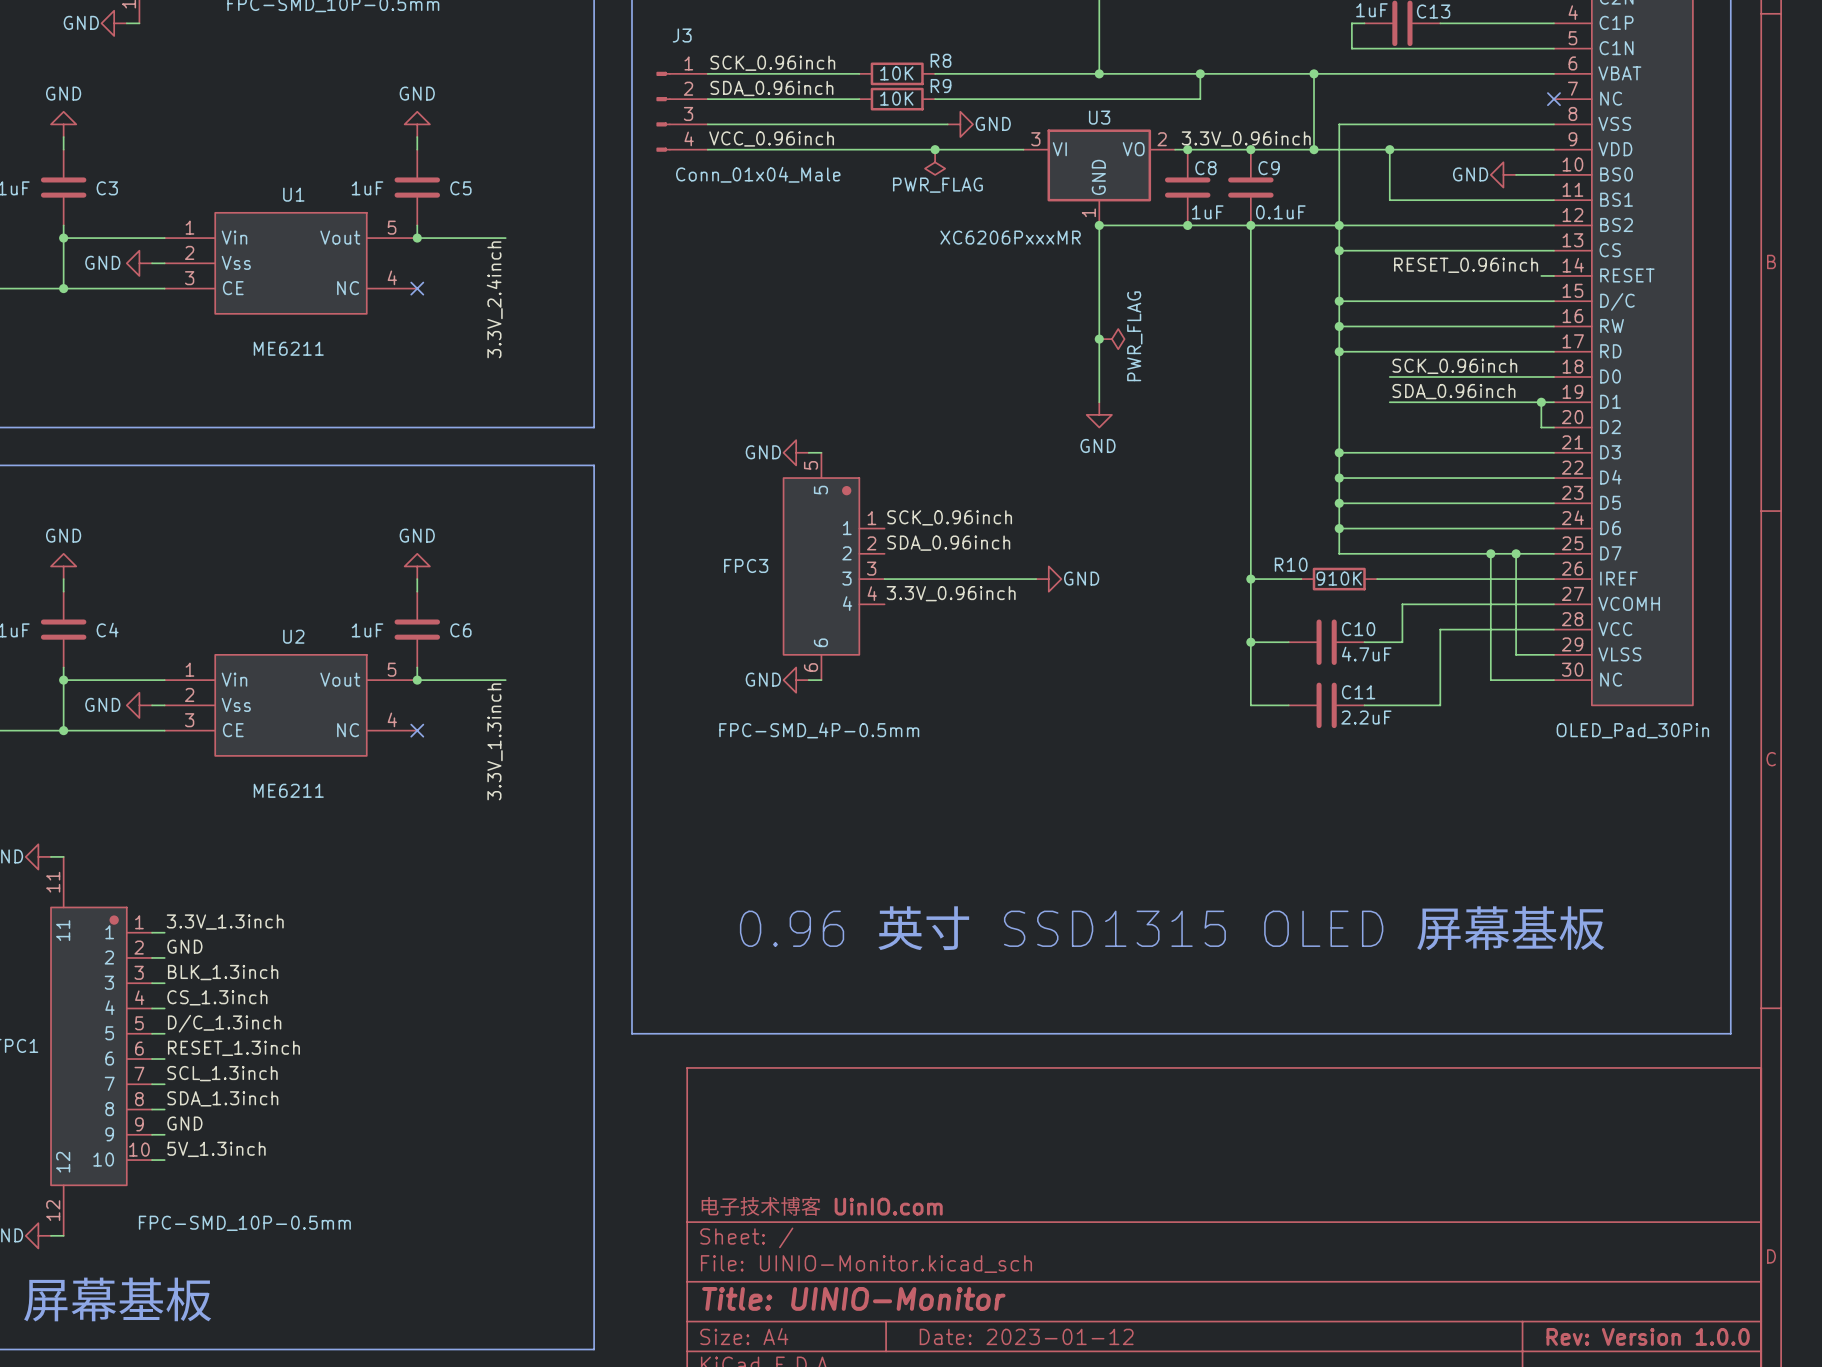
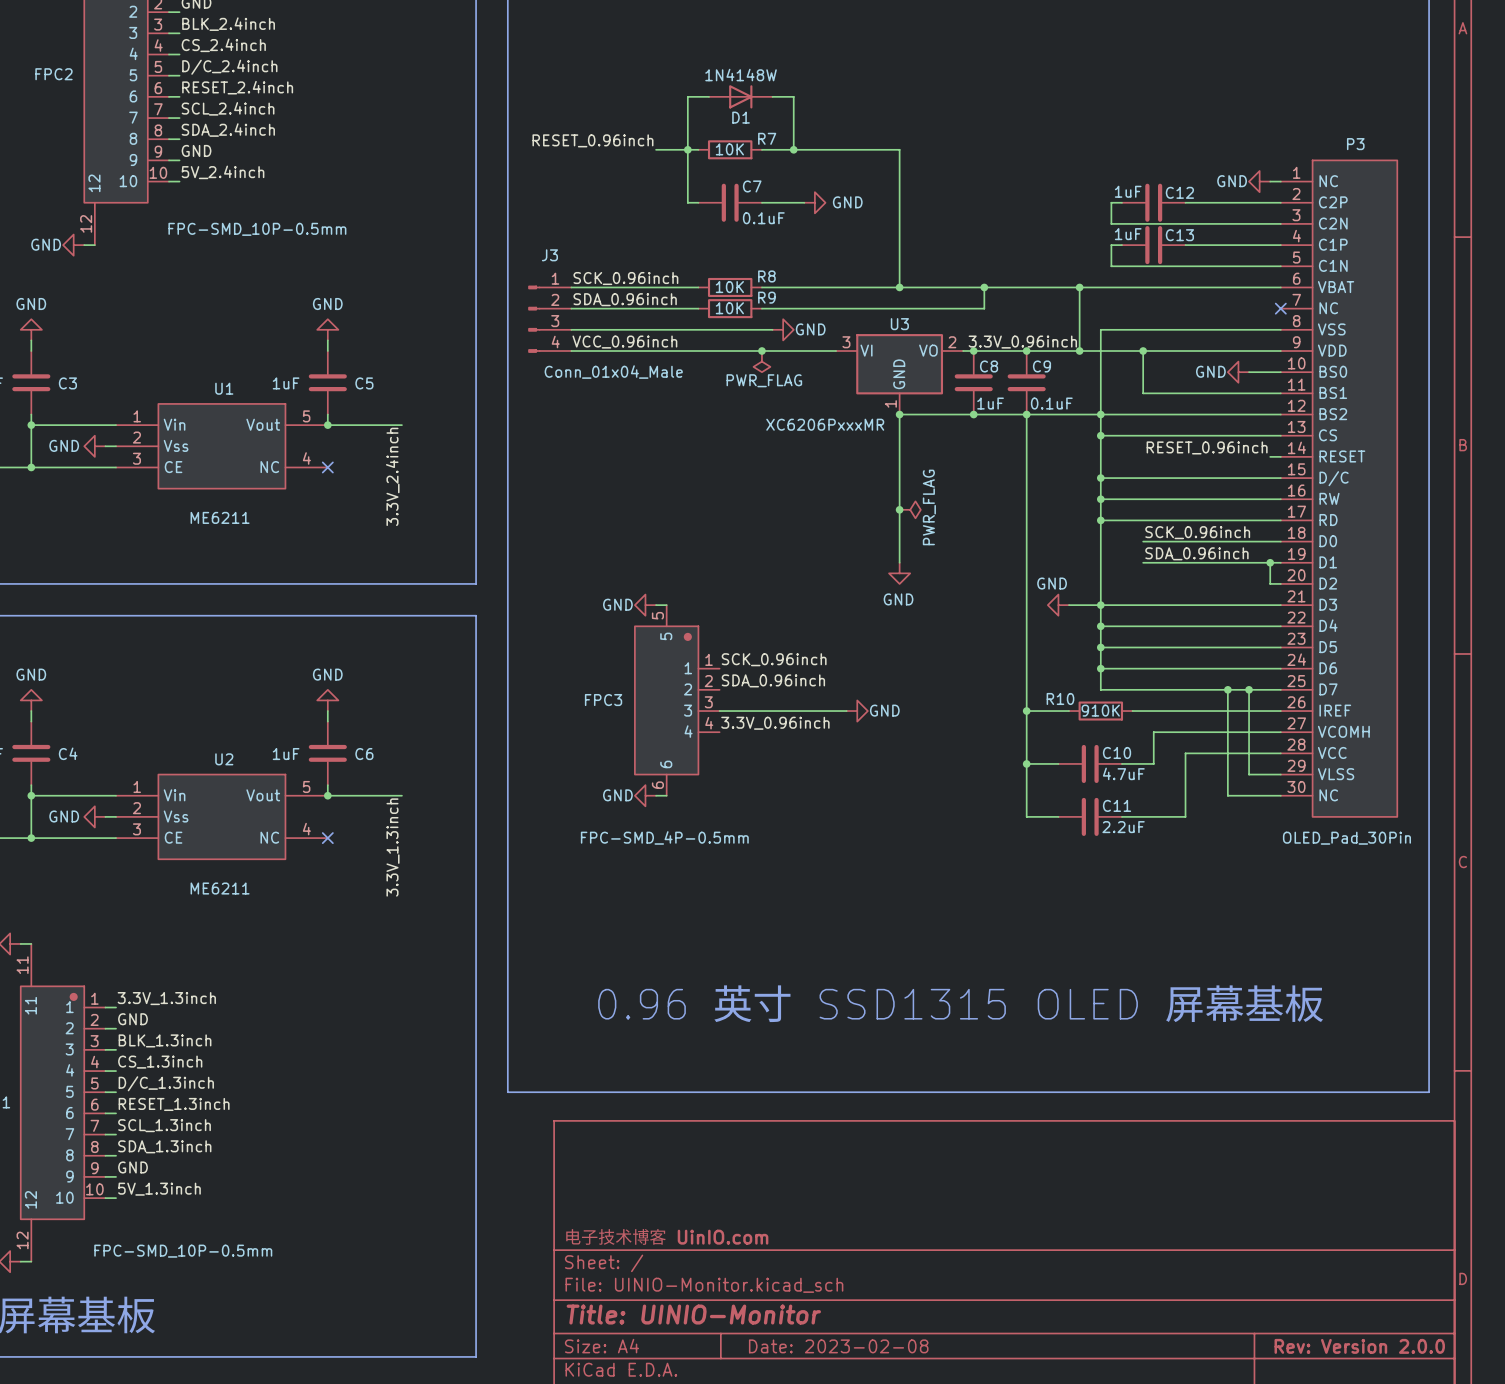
power symbol: none -> GND (1058, 605)
wire: none -> (1069, 605) (1100, 605)
title block: Date: 2023-01-12 (1026, 1336) -> Date: 2023-02-08 (838, 1346)
title block: Rev: Version 1.0.0 (1648, 1336) -> Rev: Version 2.0.0 (1359, 1346)

